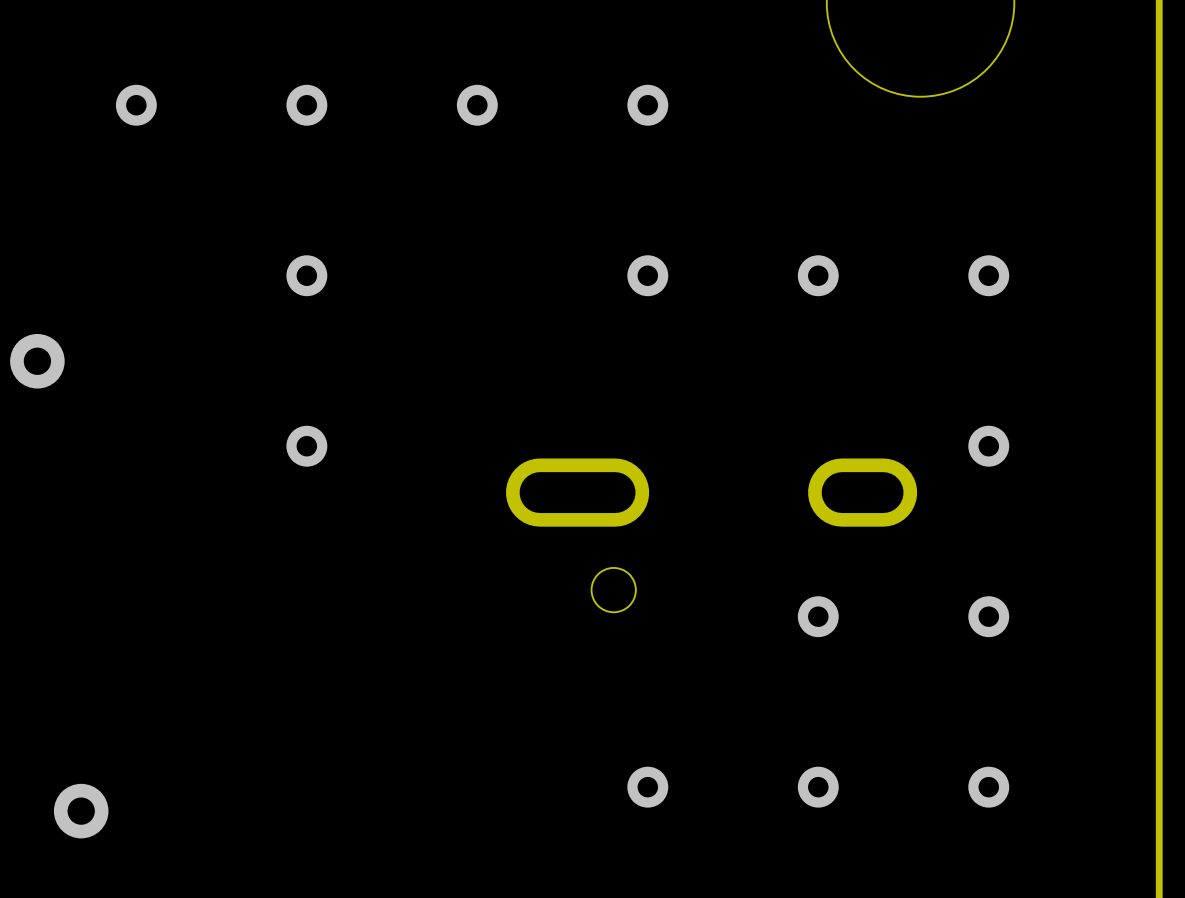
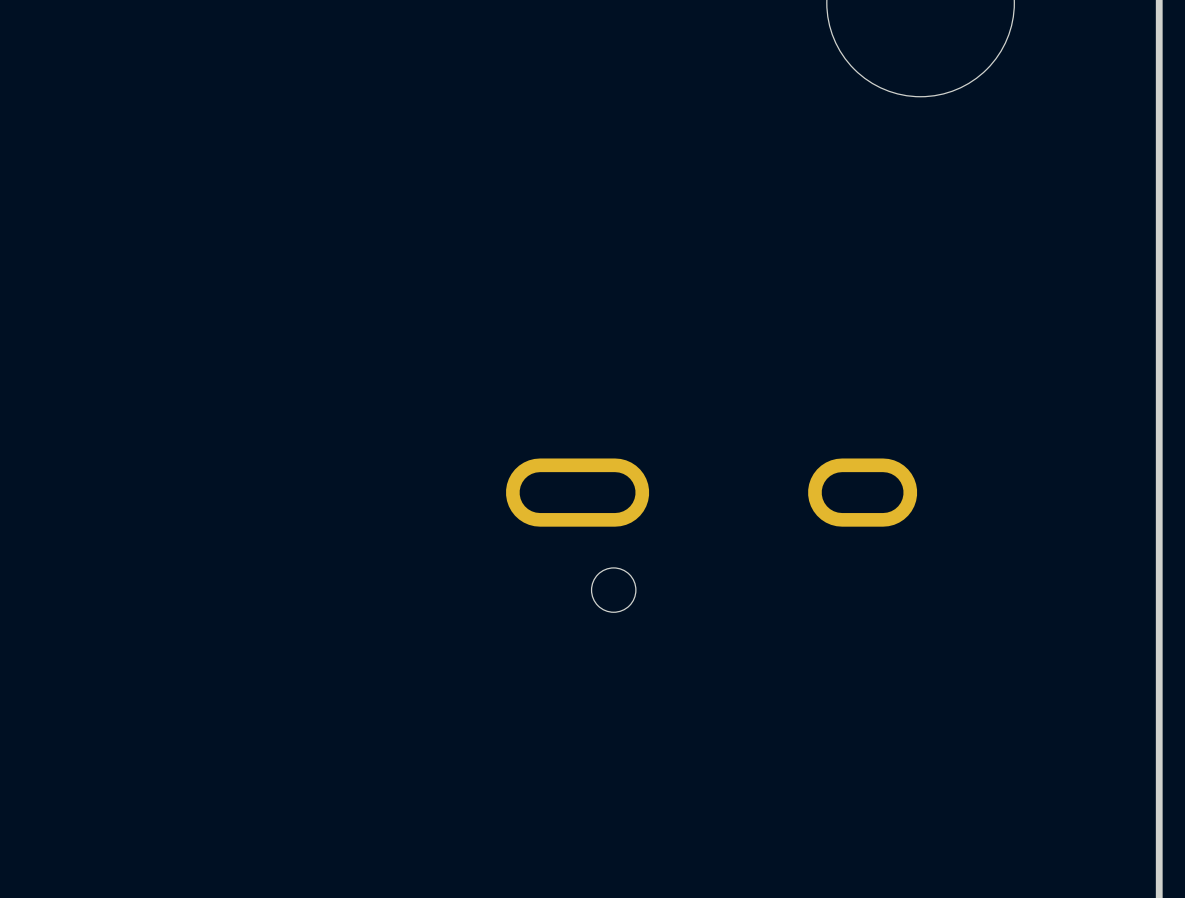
via: (136, 105) -> none
via: (306, 105) -> none
via: (477, 105) -> none
via: (647, 105) -> none
via: (306, 275) -> none
via: (647, 275) -> none
via: (818, 275) -> none
via: (988, 275) -> none
via: (37, 361) -> none
via: (306, 446) -> none
via: (988, 446) -> none
via: (818, 616) -> none
via: (988, 616) -> none
via: (647, 787) -> none
via: (818, 787) -> none
via: (988, 787) -> none
via: (81, 811) -> none

